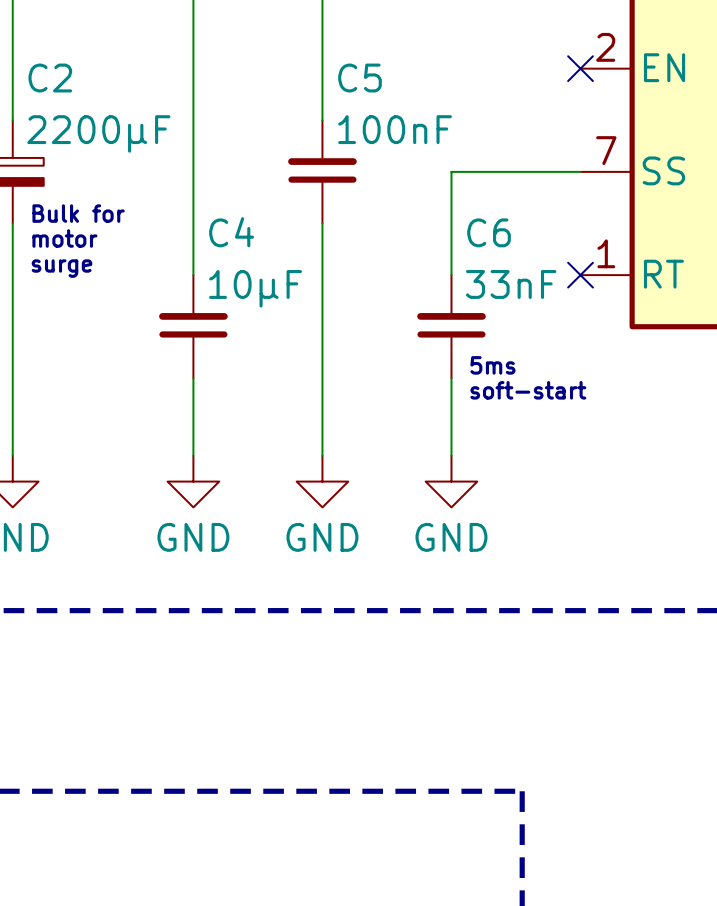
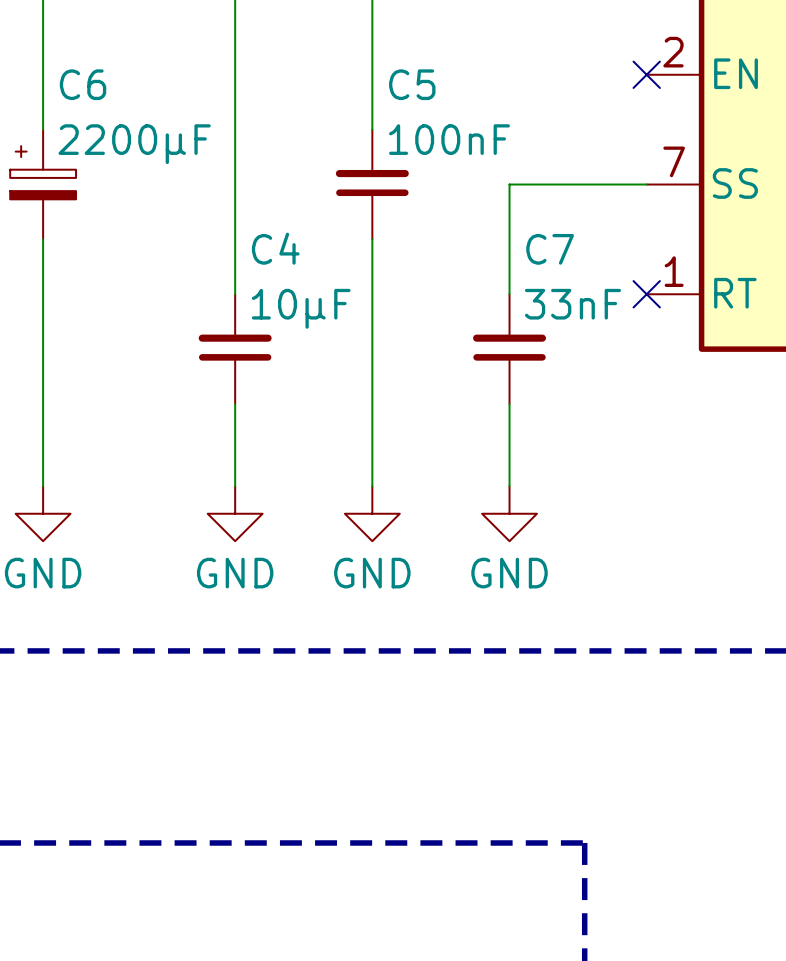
C2 name: C2 (50, 78) -> C6 (83, 84)
text: Bulk for (78, 213) -> none
C6 name: C6 (489, 232) -> C7 (550, 249)
text: motor (64, 238) -> none
text: surge (61, 268) -> none
text: 5ms (492, 365) -> none
text: soft-start (528, 390) -> none

